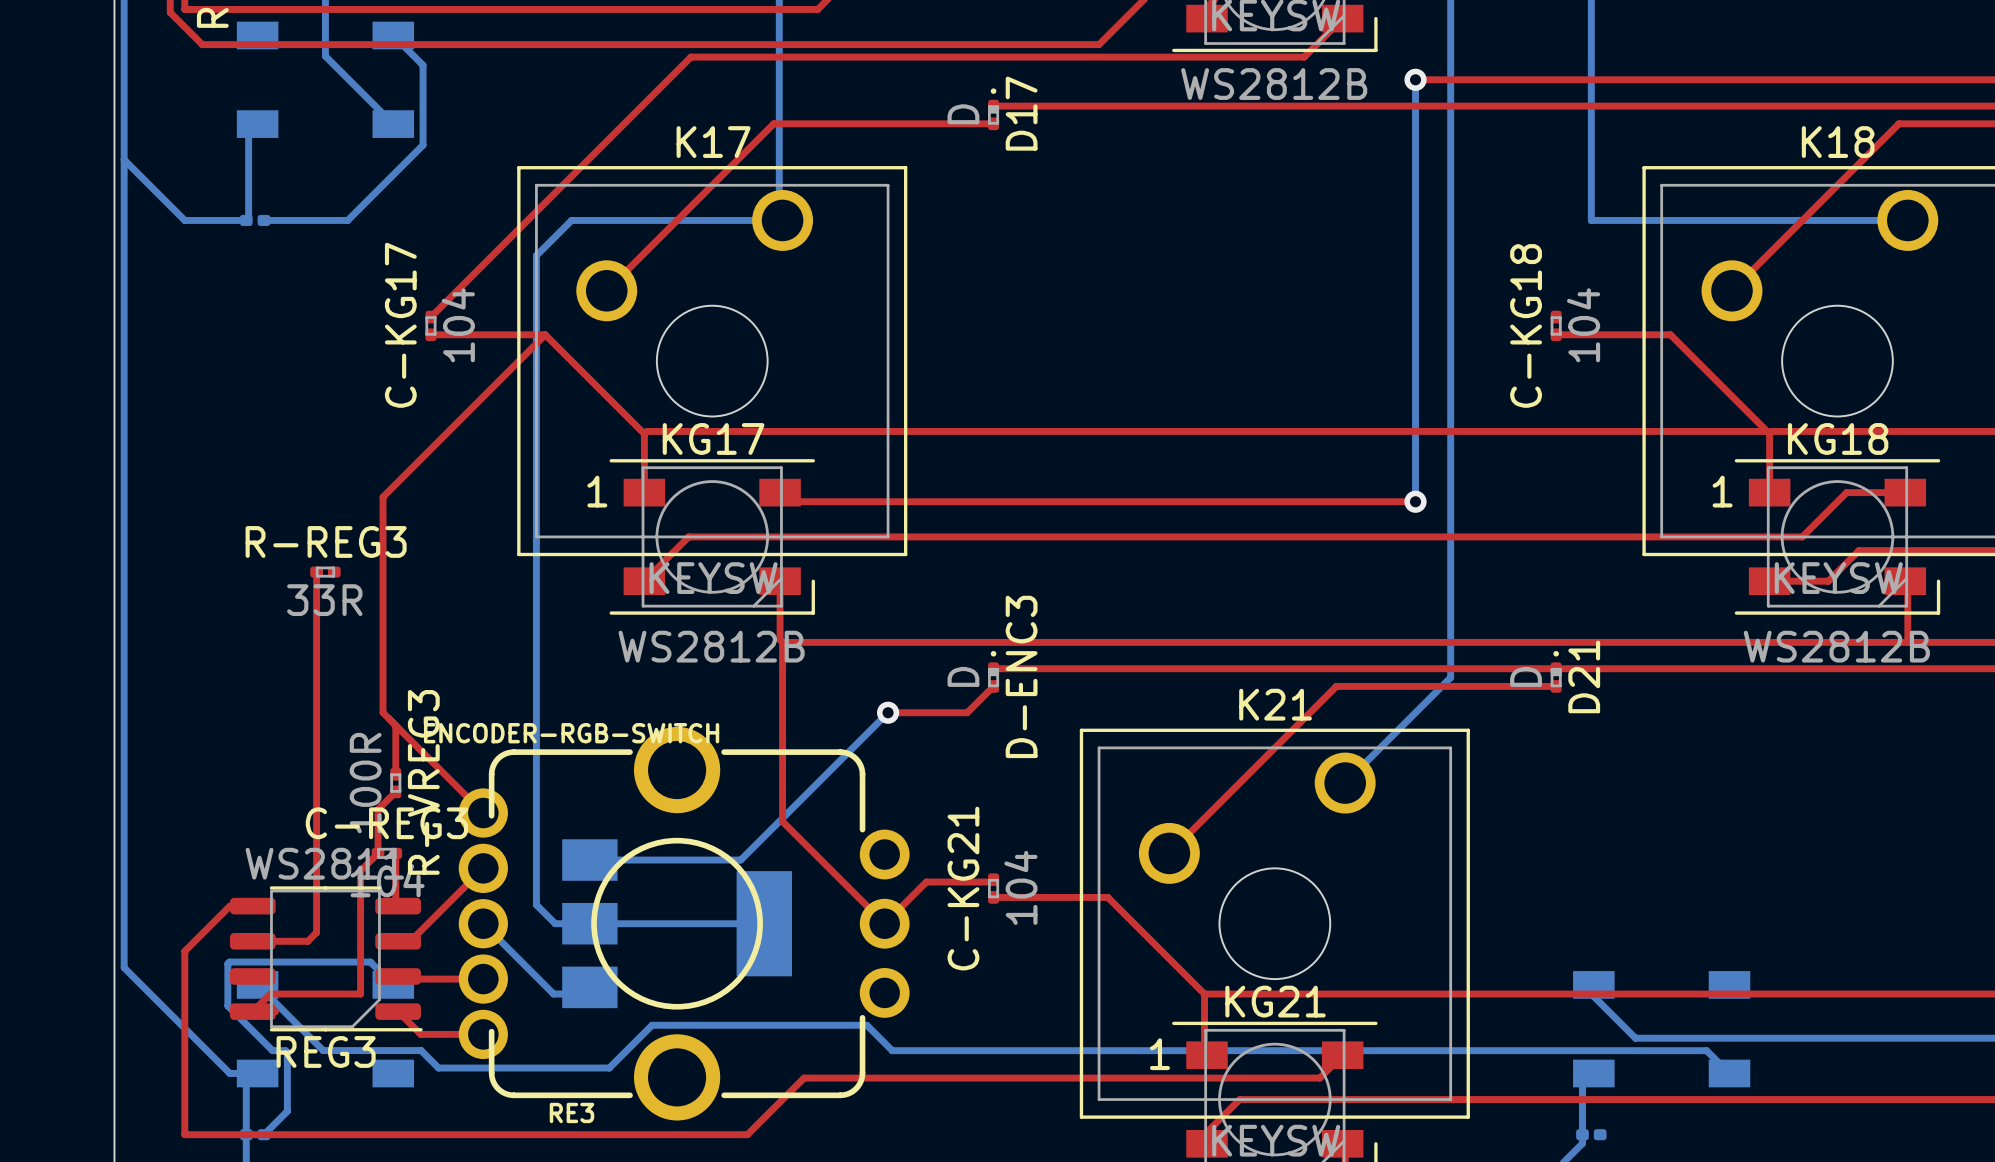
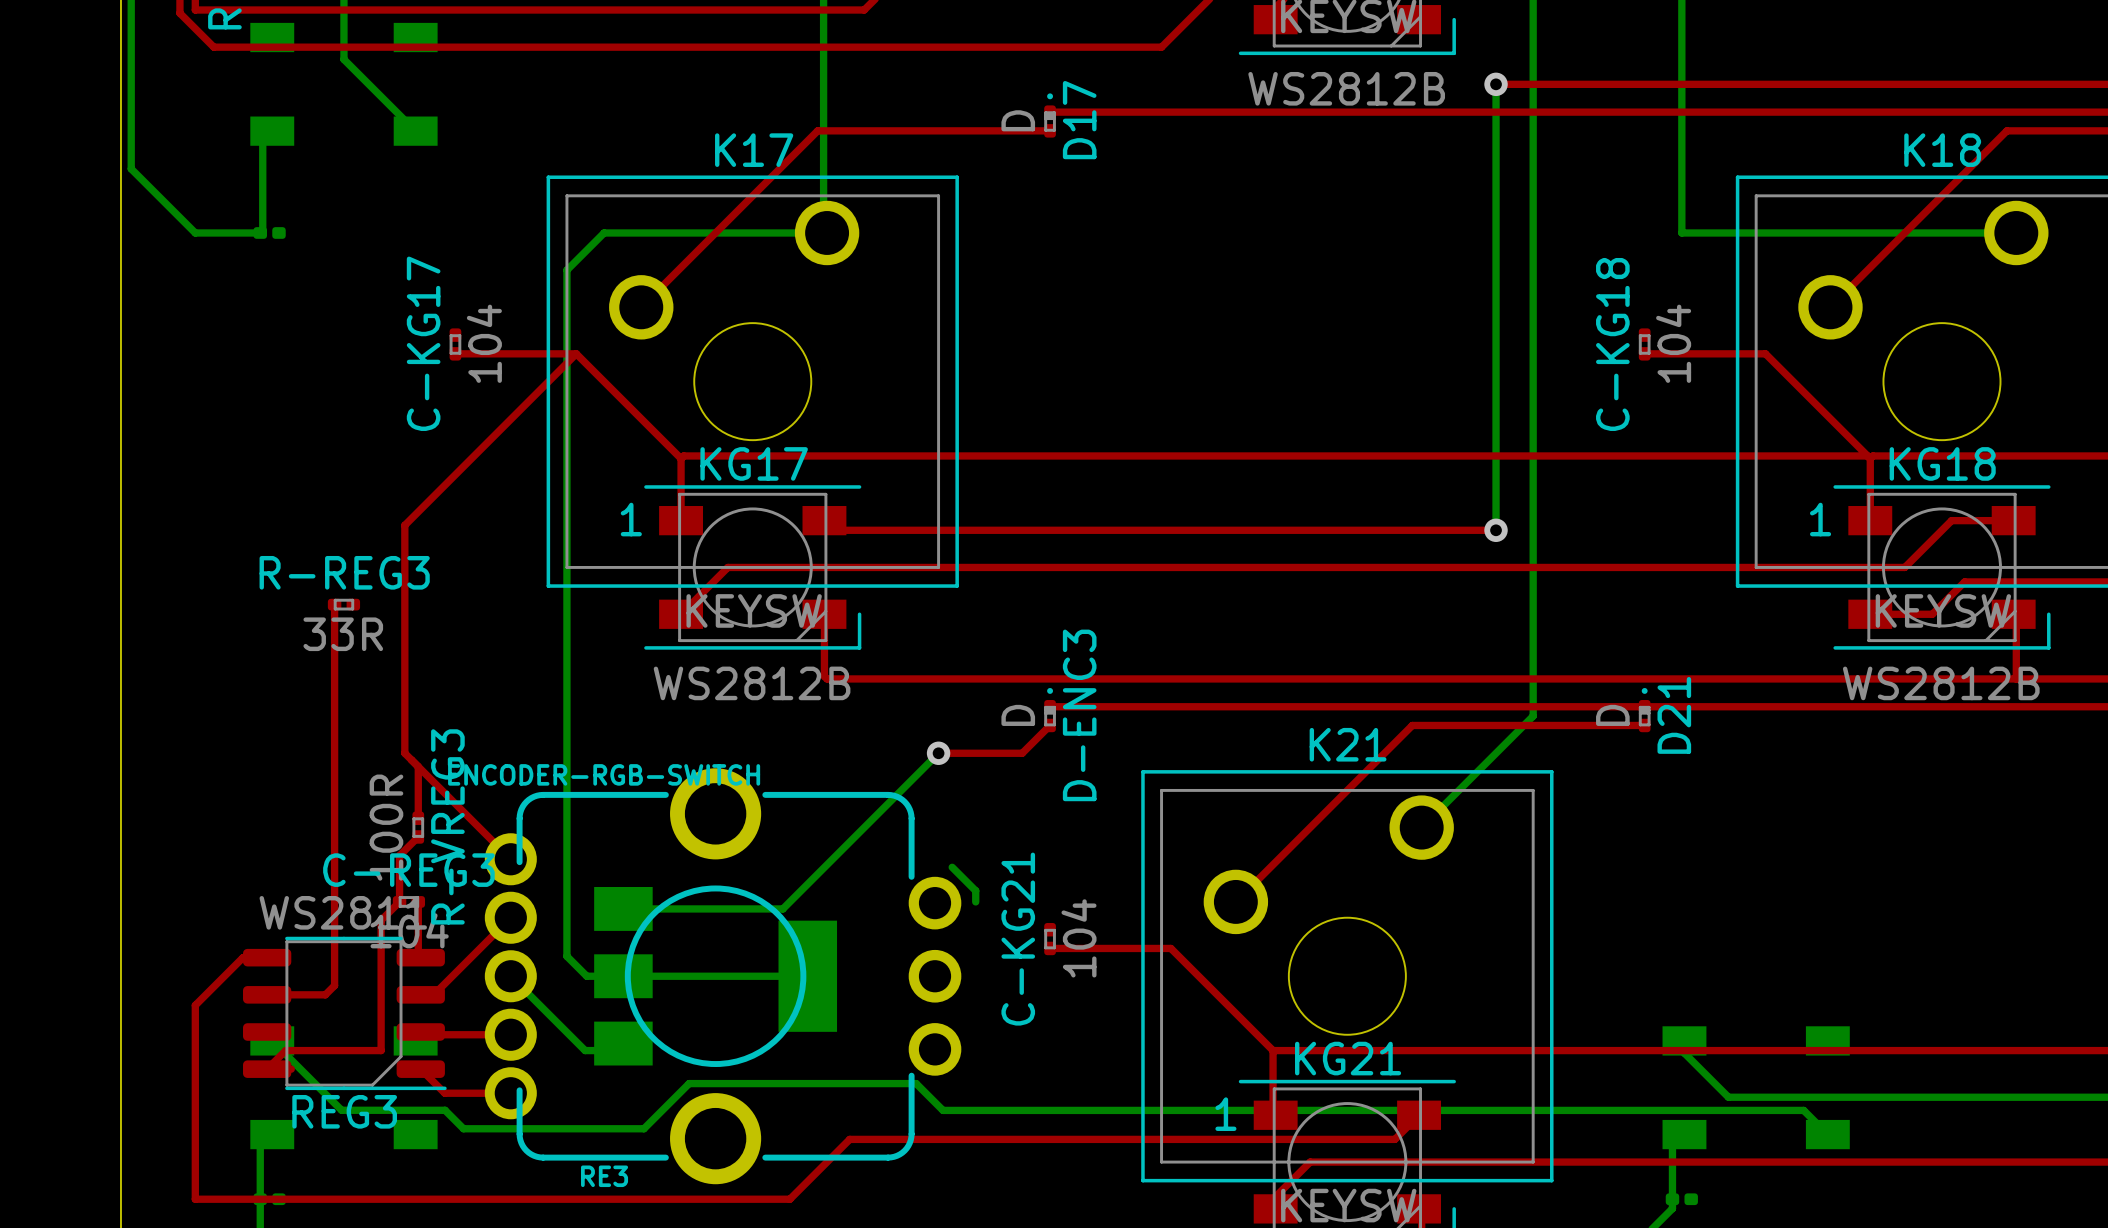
top track: (1342, 18) (1304, 57) (690, 57) (430, 317) -> none
bottom track: (393, 35) (423, 65) (423, 145) (347, 220) (263, 220) -> none
bottom track: (124, 159) (124, 967) (229, 1073) (257, 1073) -> none
top track: (782, 642) (782, 821) (884, 923) (926, 882) (991, 882) (993, 879) -> none
bottom track: none -> (952, 867) (975, 890) (975, 901)
bottom track: (393, 984) (370, 962) (229, 962) (227, 963) (227, 1005) (272, 1050) (285, 1050) (287, 1052) (287, 1111) (263, 1134) -> none

